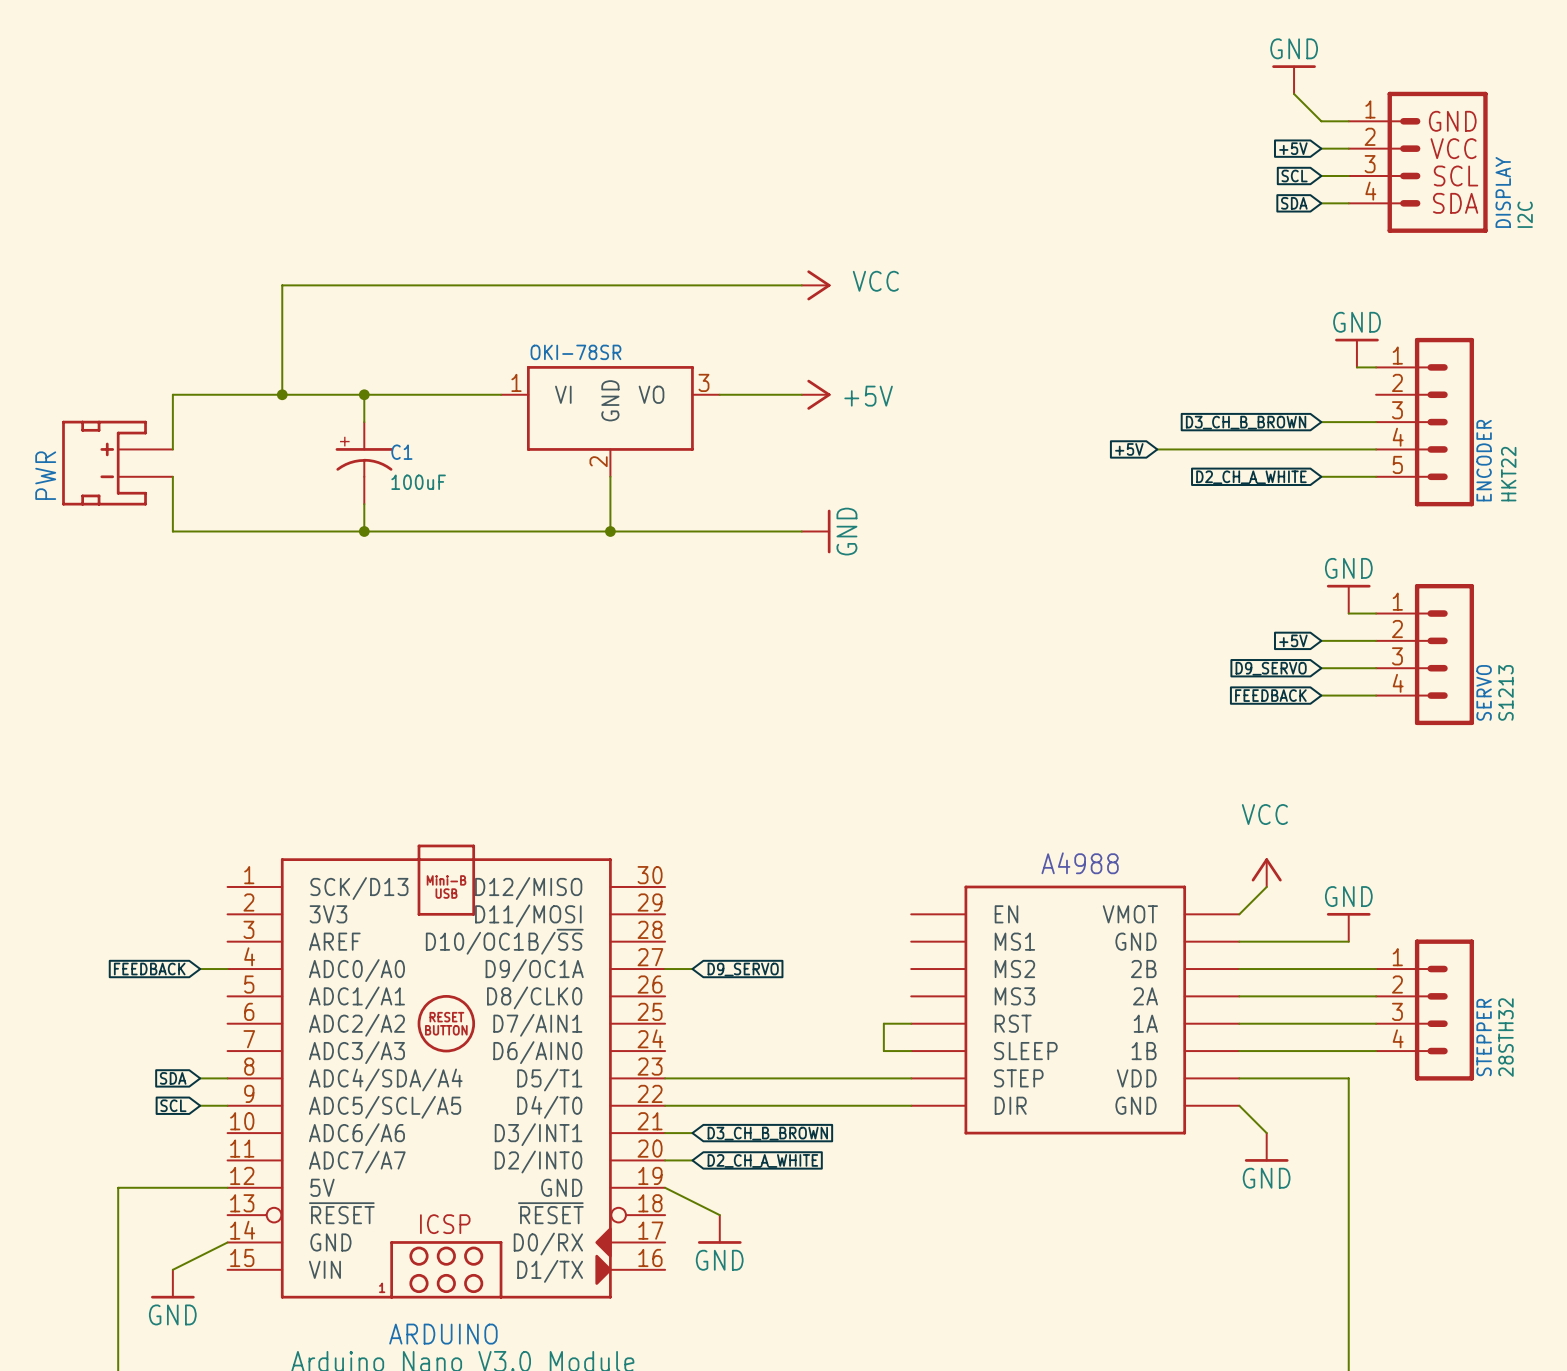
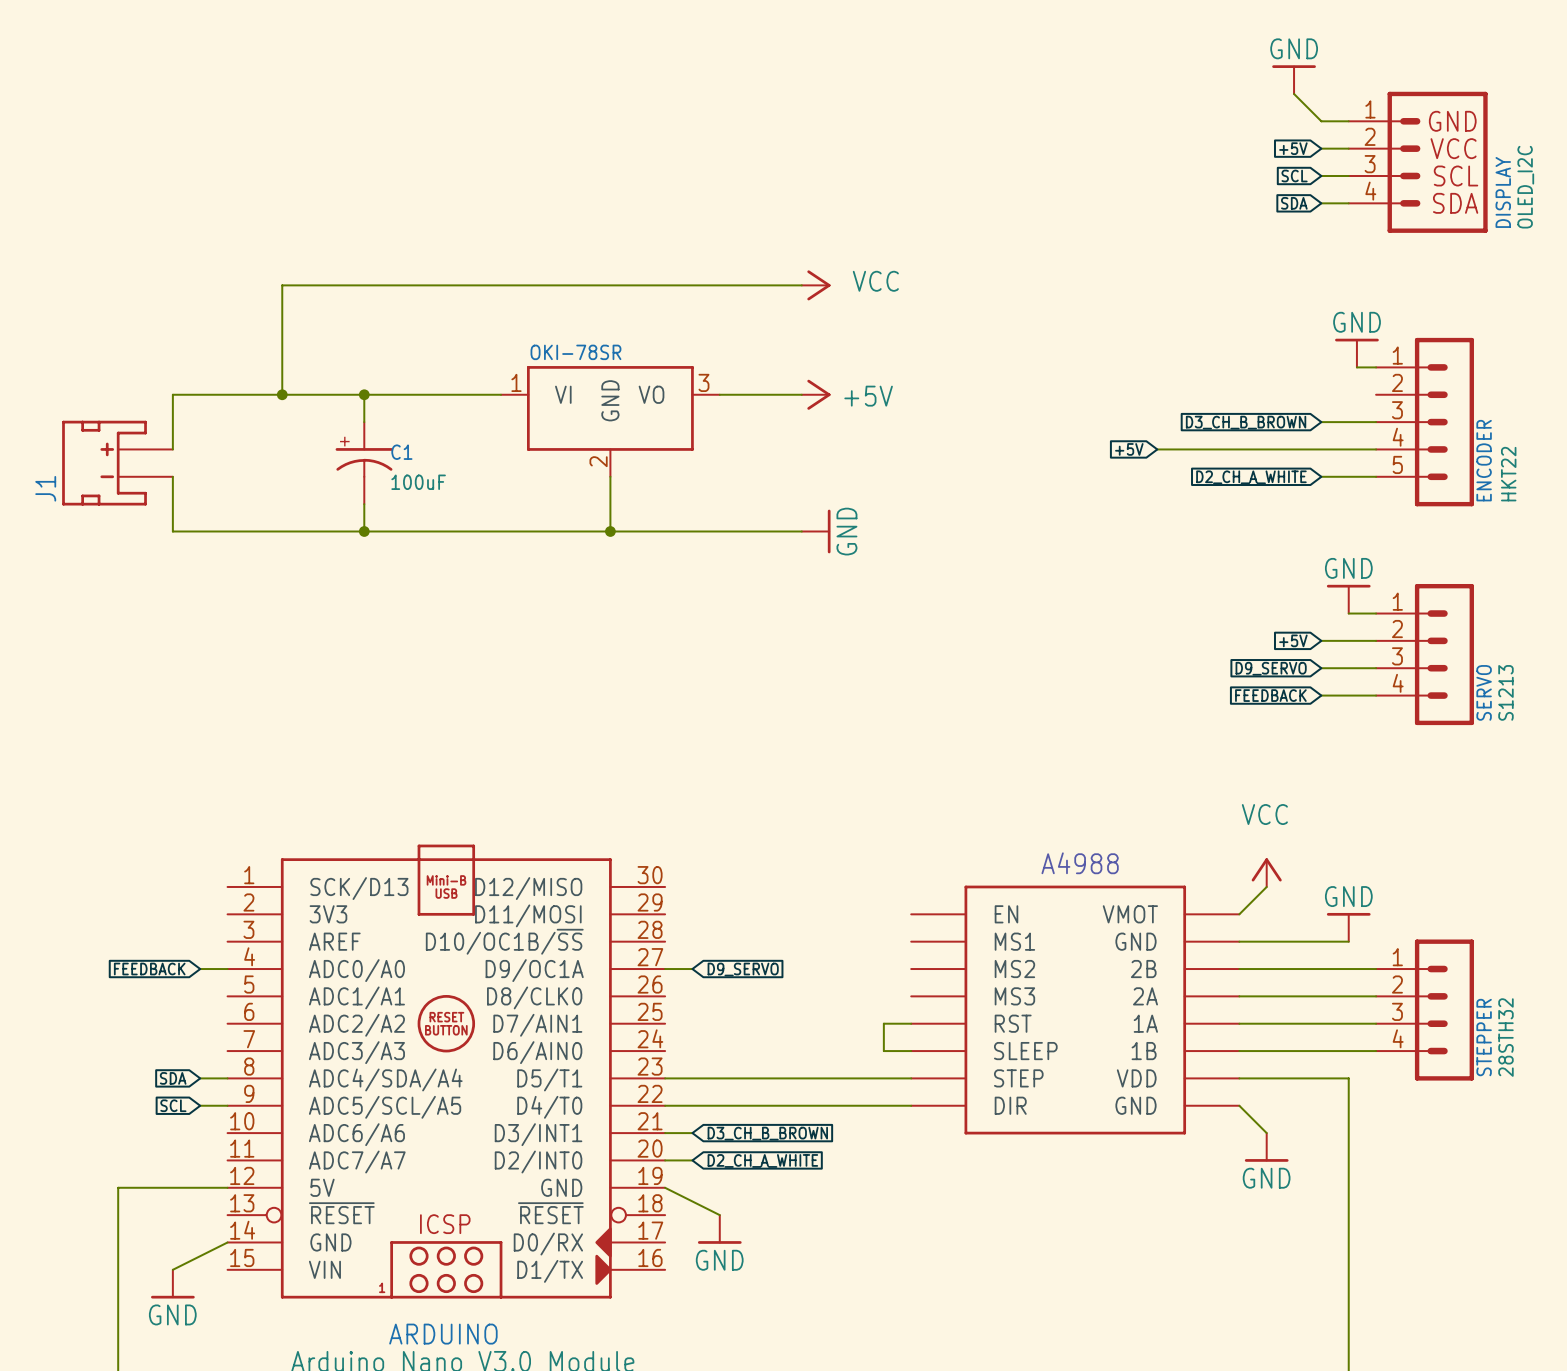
DISPLAY value: I2C (1525, 214) -> OLED_I2C (1525, 187)
PWR name: PWR (45, 475) -> J1 (45, 488)

